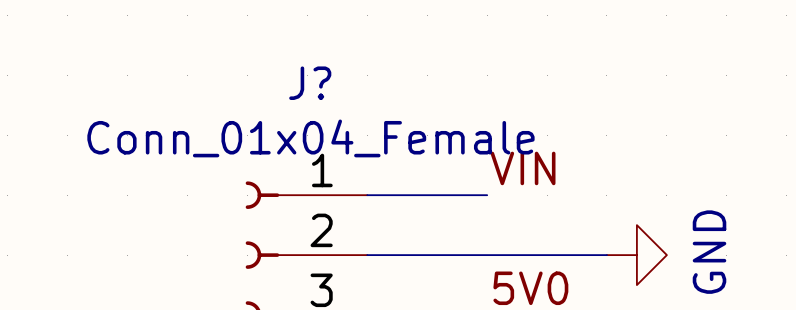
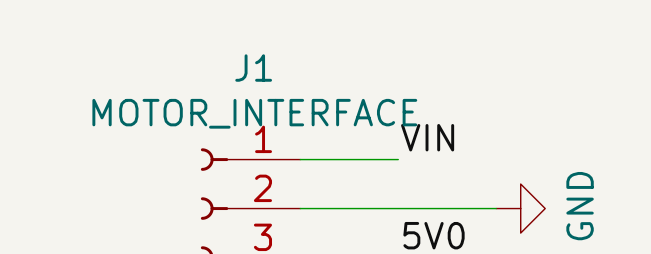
J? name: J? (310, 83) -> J1 (253, 68)
J? value: Conn_01x04_Female (310, 138) -> MOTOR_INTERFACE (254, 113)

